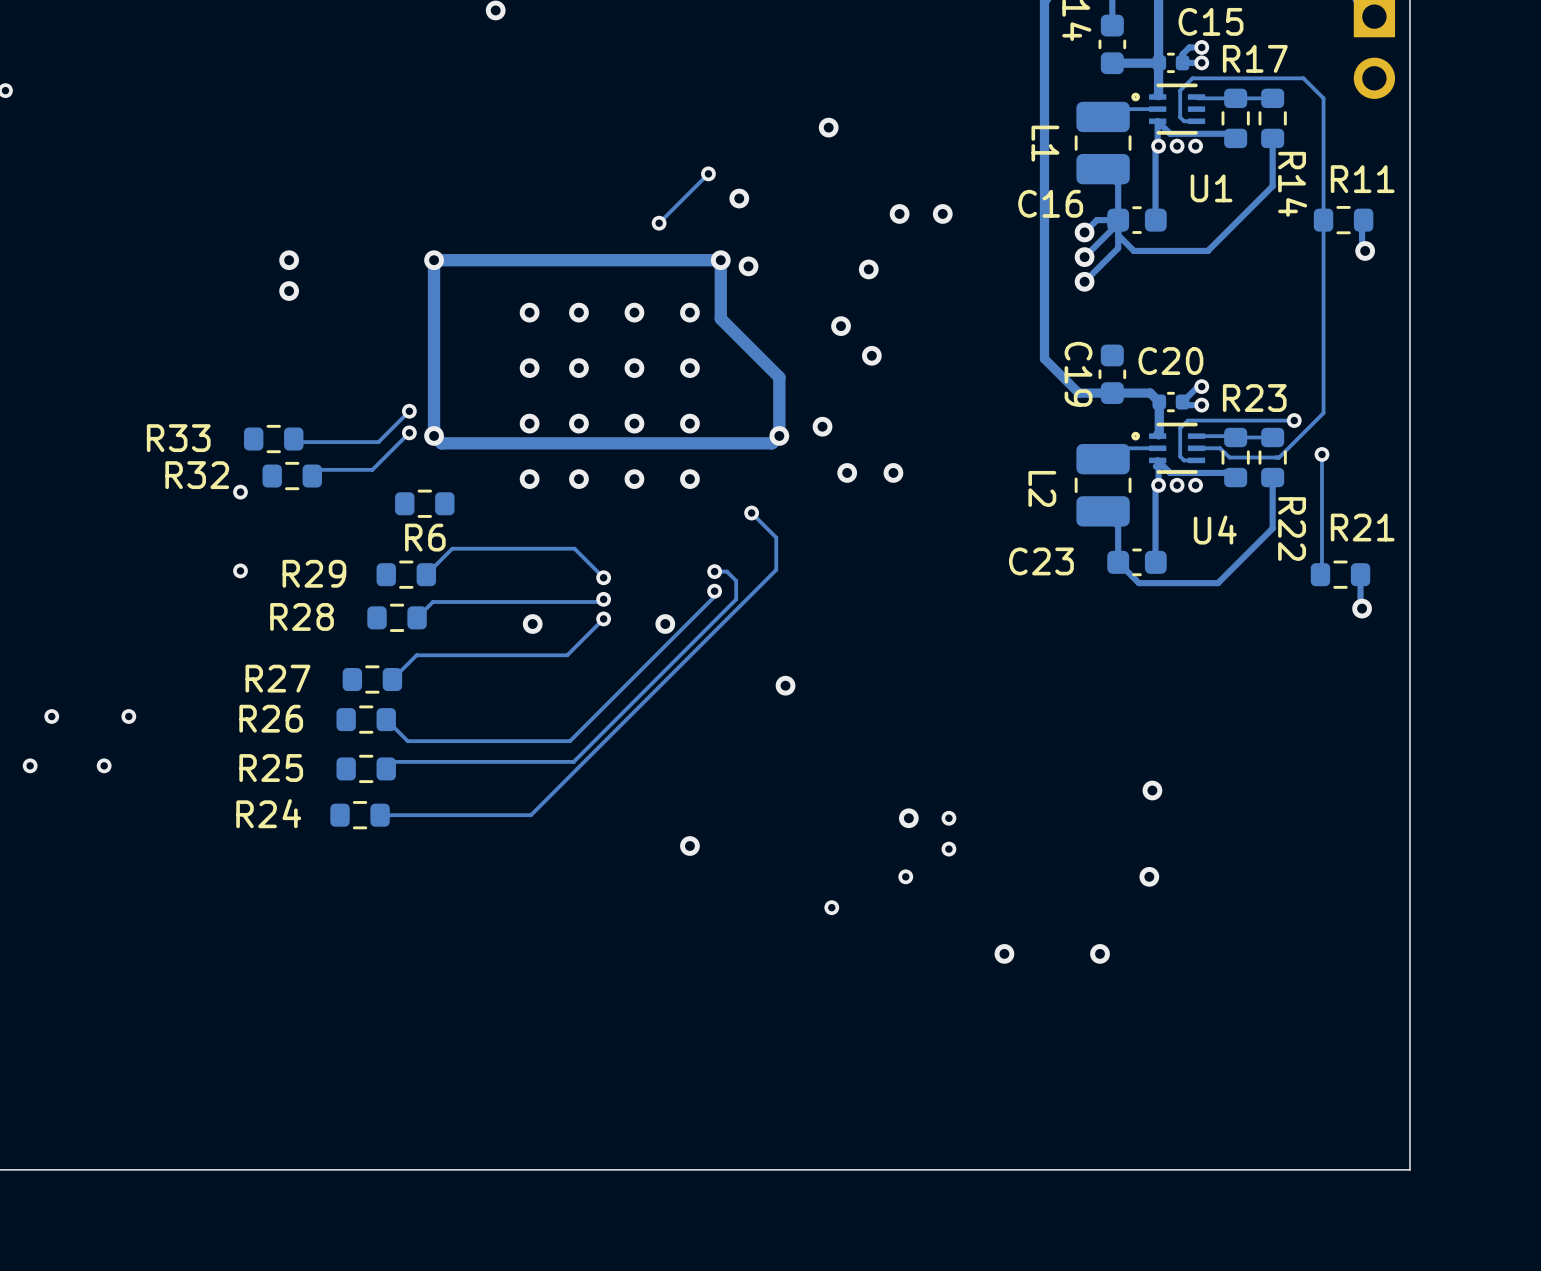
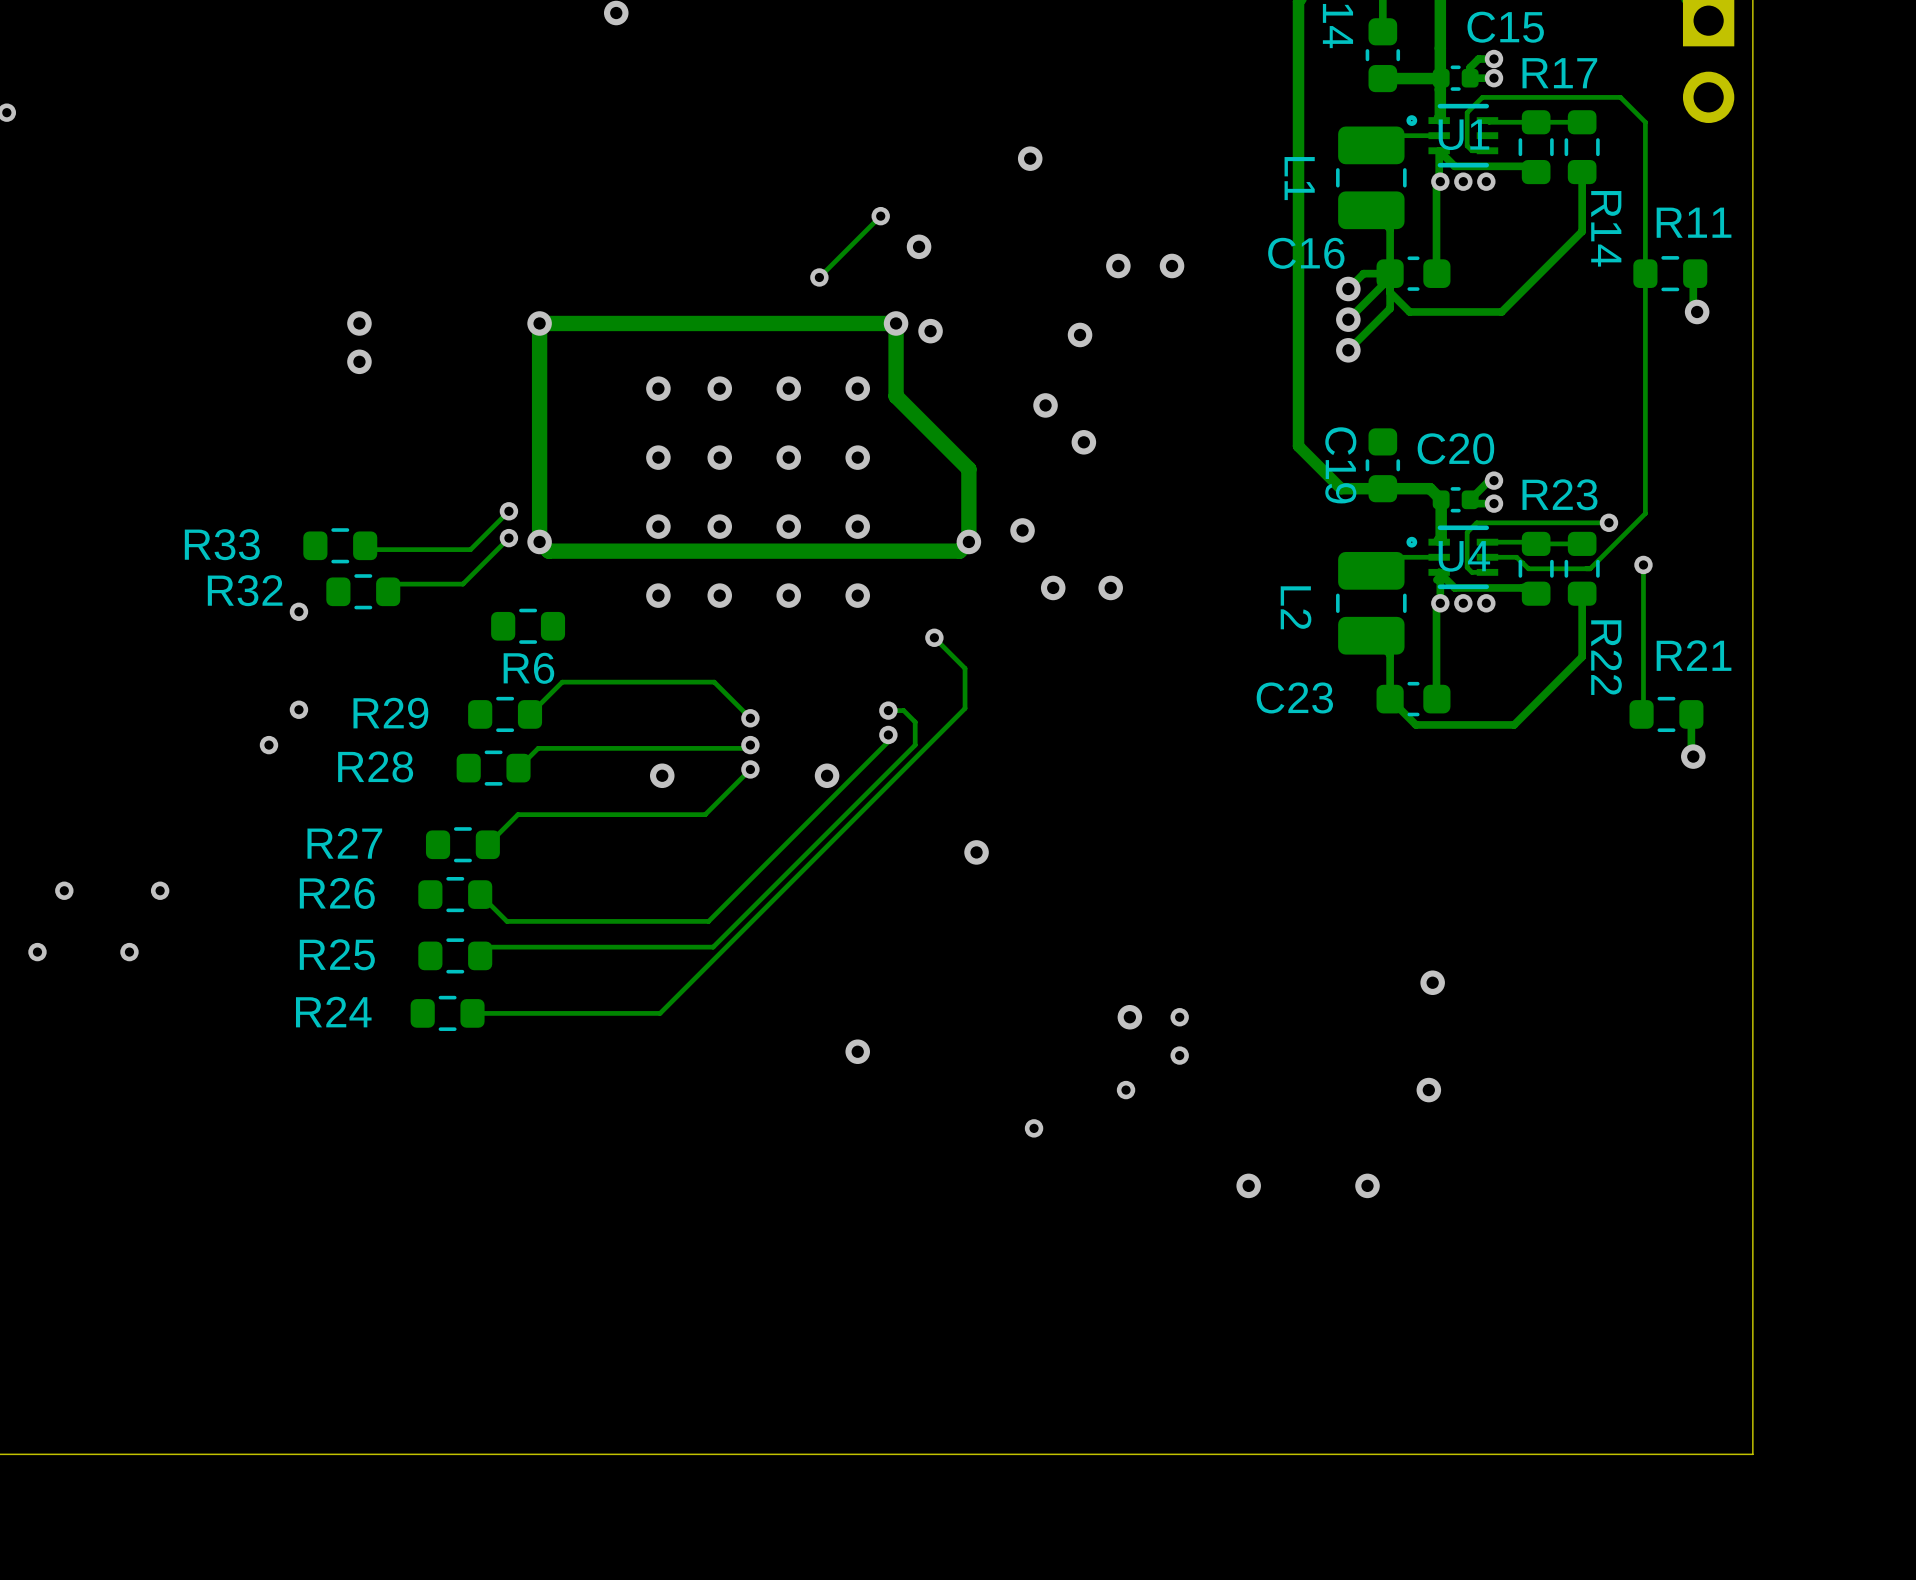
U1 name position: U1 (1211, 188) -> U1 (1463, 134)
U4 name position: U4 (1215, 530) -> U4 (1464, 556)
via: none -> (268, 745)

